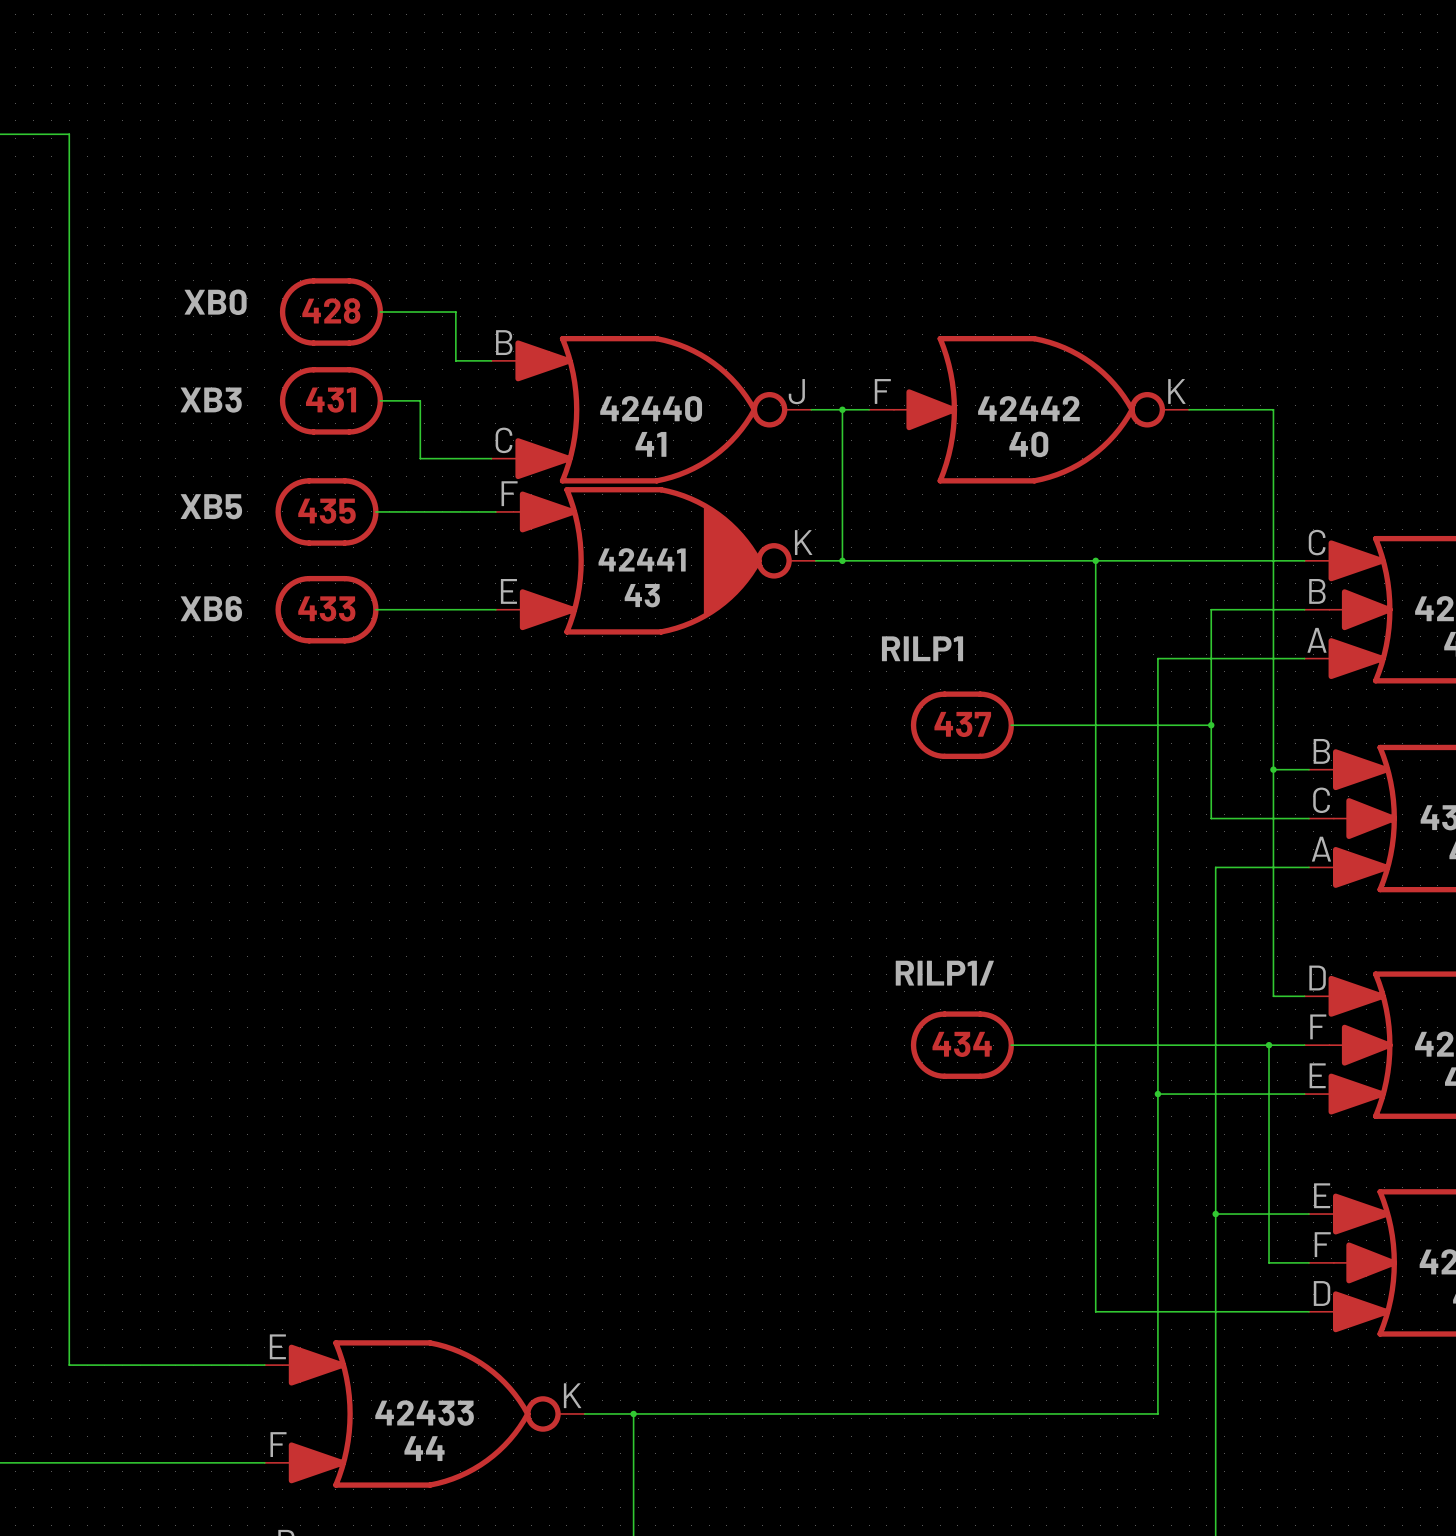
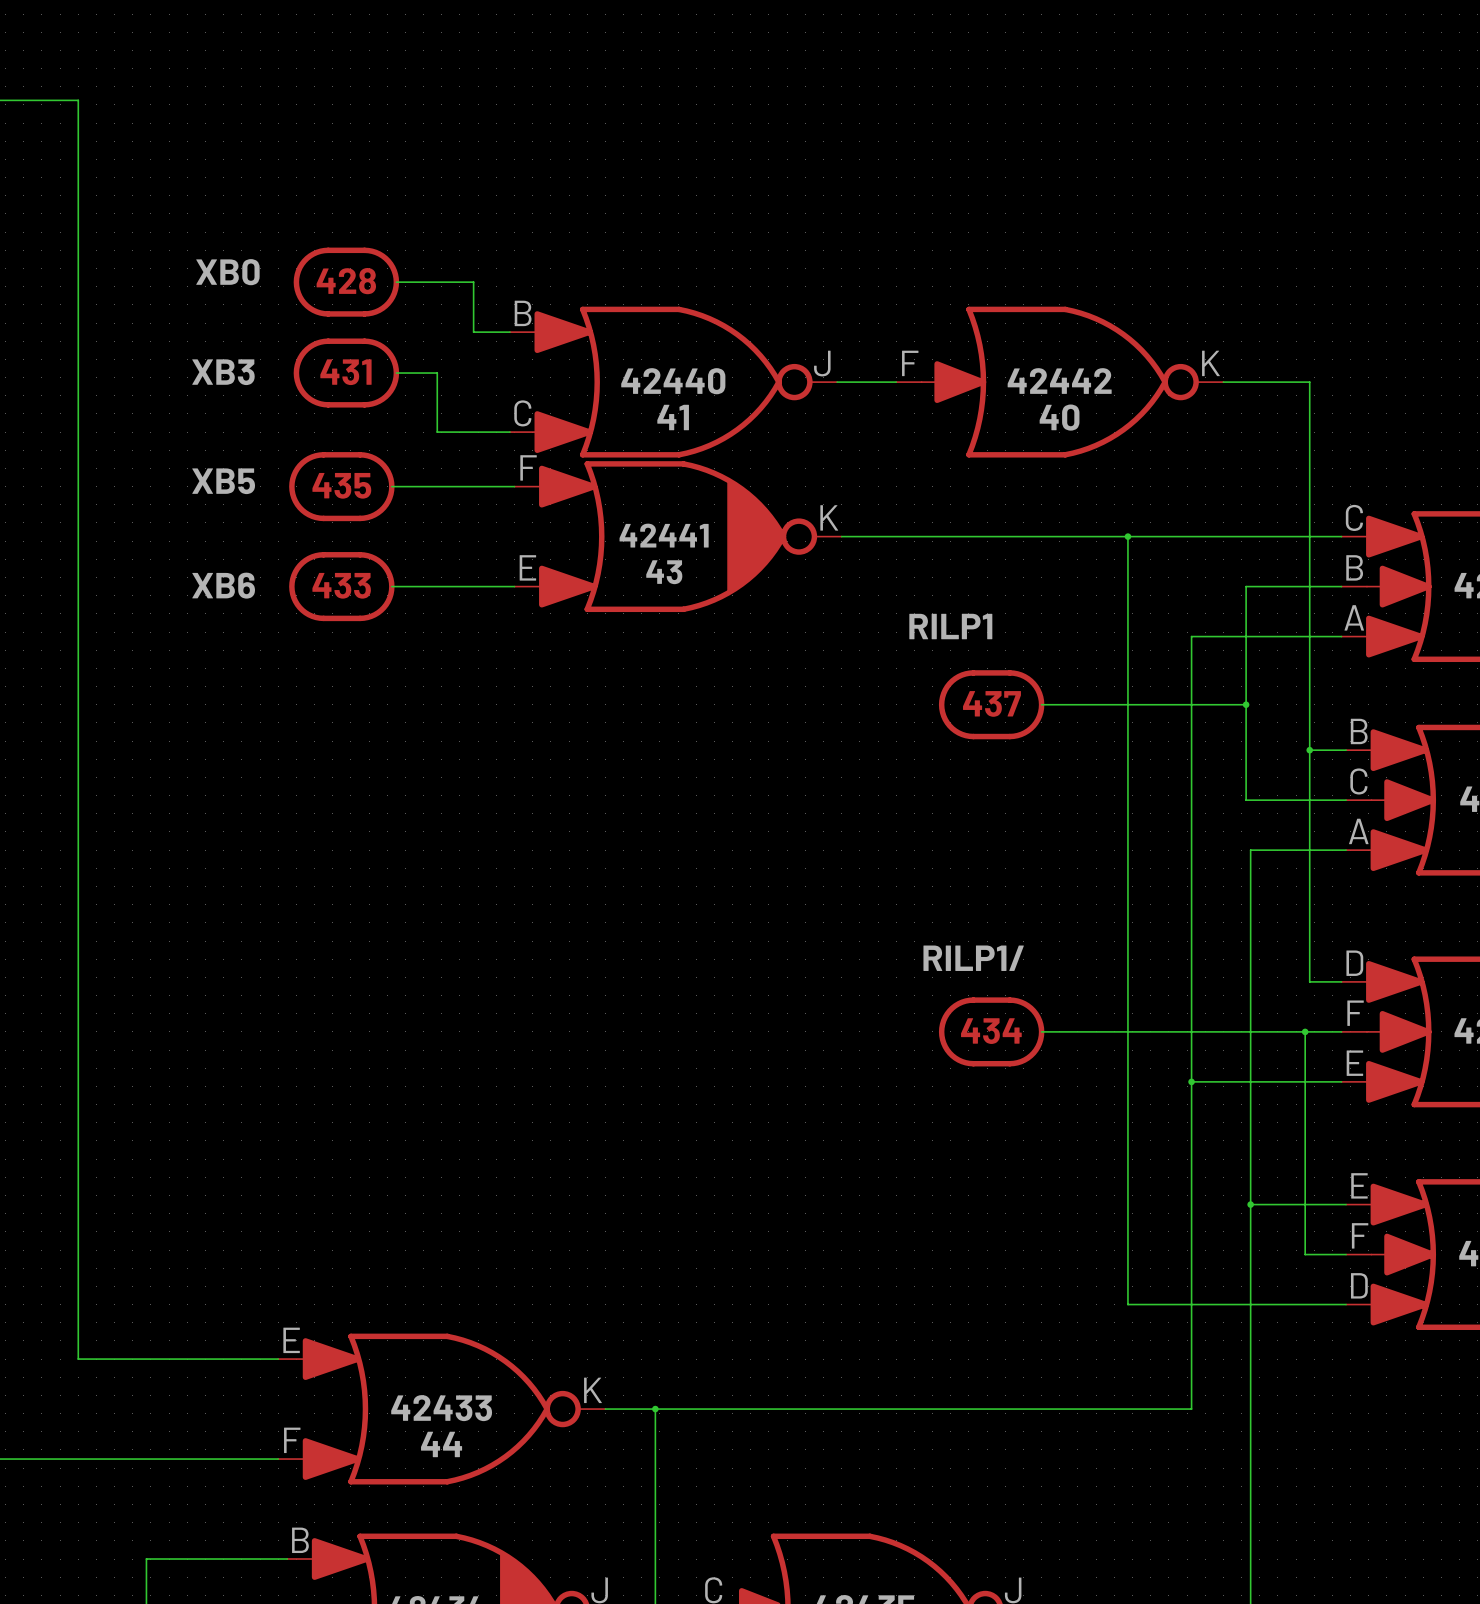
wire: (842, 409) (842, 560) -> none
junction: (842, 409) -> none
junction: (842, 560) -> none

